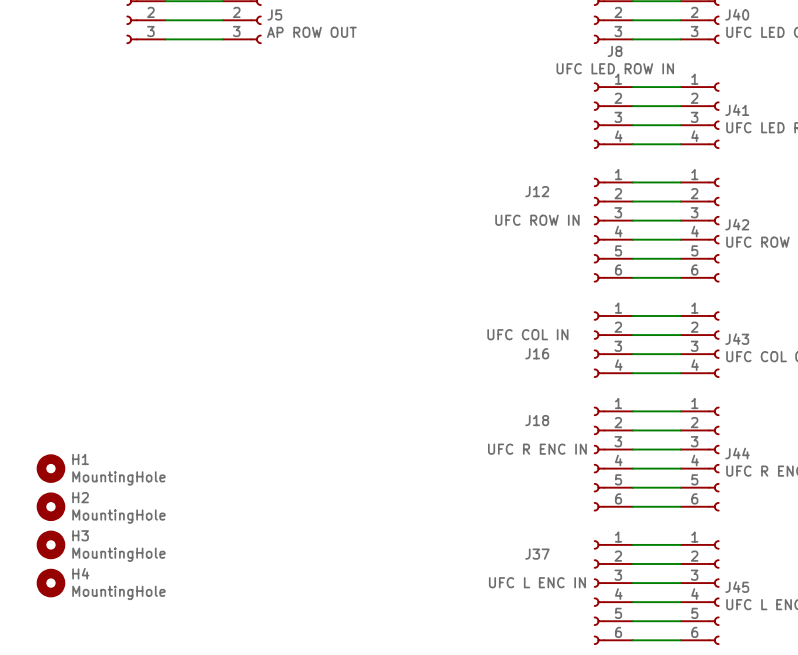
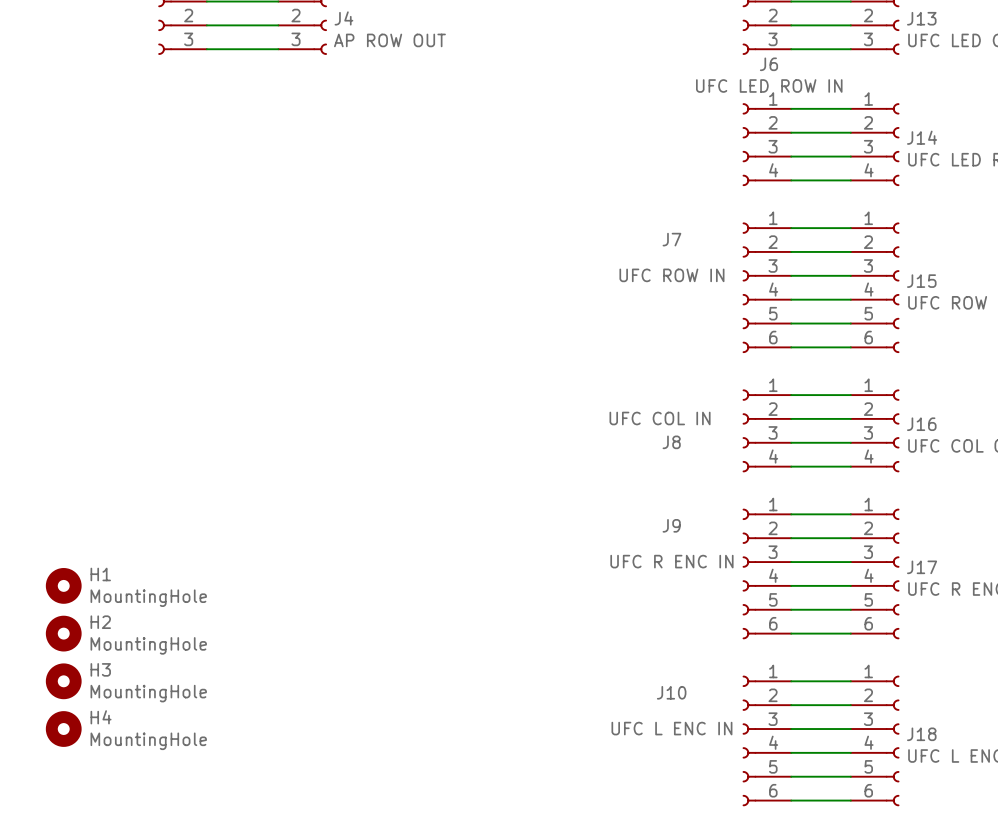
J5 name: J5 (274, 14) -> J4 (343, 18)
J40 name: J40 (737, 14) -> J13 (921, 18)
J8 name: J8 (615, 51) -> J6 (768, 64)
J41 name: J41 (737, 110) -> J14 (922, 137)
J12 name: J12 (537, 191) -> J7 (671, 239)
J42 name: J42 (737, 224) -> J15 (921, 281)
J43 name: J43 (737, 339) -> J16 (921, 424)
J16 name: J16 (537, 353) -> J8 (671, 442)
J18 name: J18 (537, 420) -> J9 (671, 525)
J44 name: J44 (737, 453) -> J17 (922, 567)
J37 name: J37 (537, 554) -> J10 (671, 692)
J45 name: J45 (737, 587) -> J18 (921, 734)

